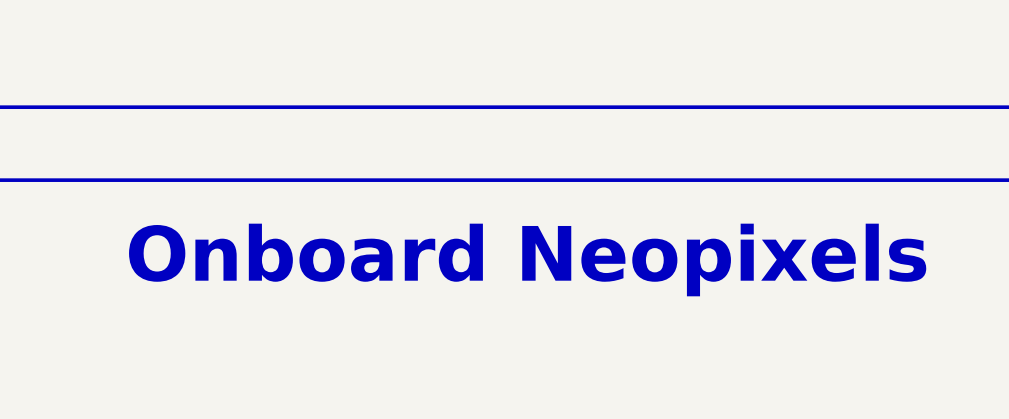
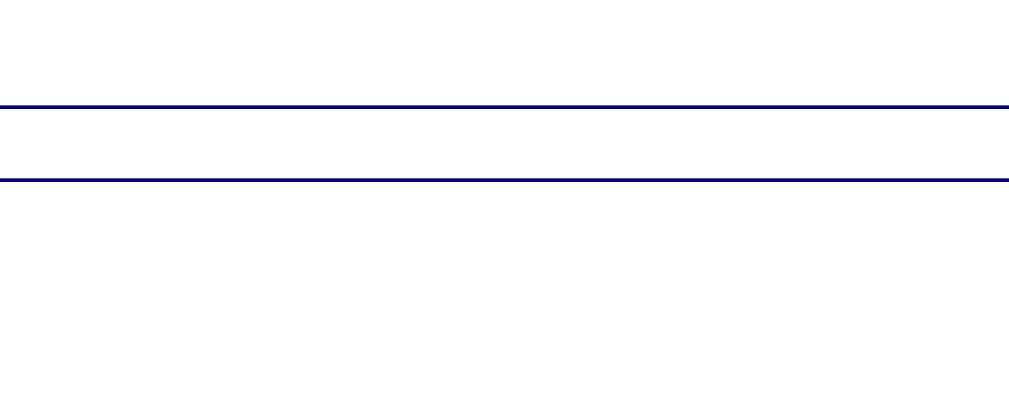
text: Onboard Neopixels (527, 259) -> none

